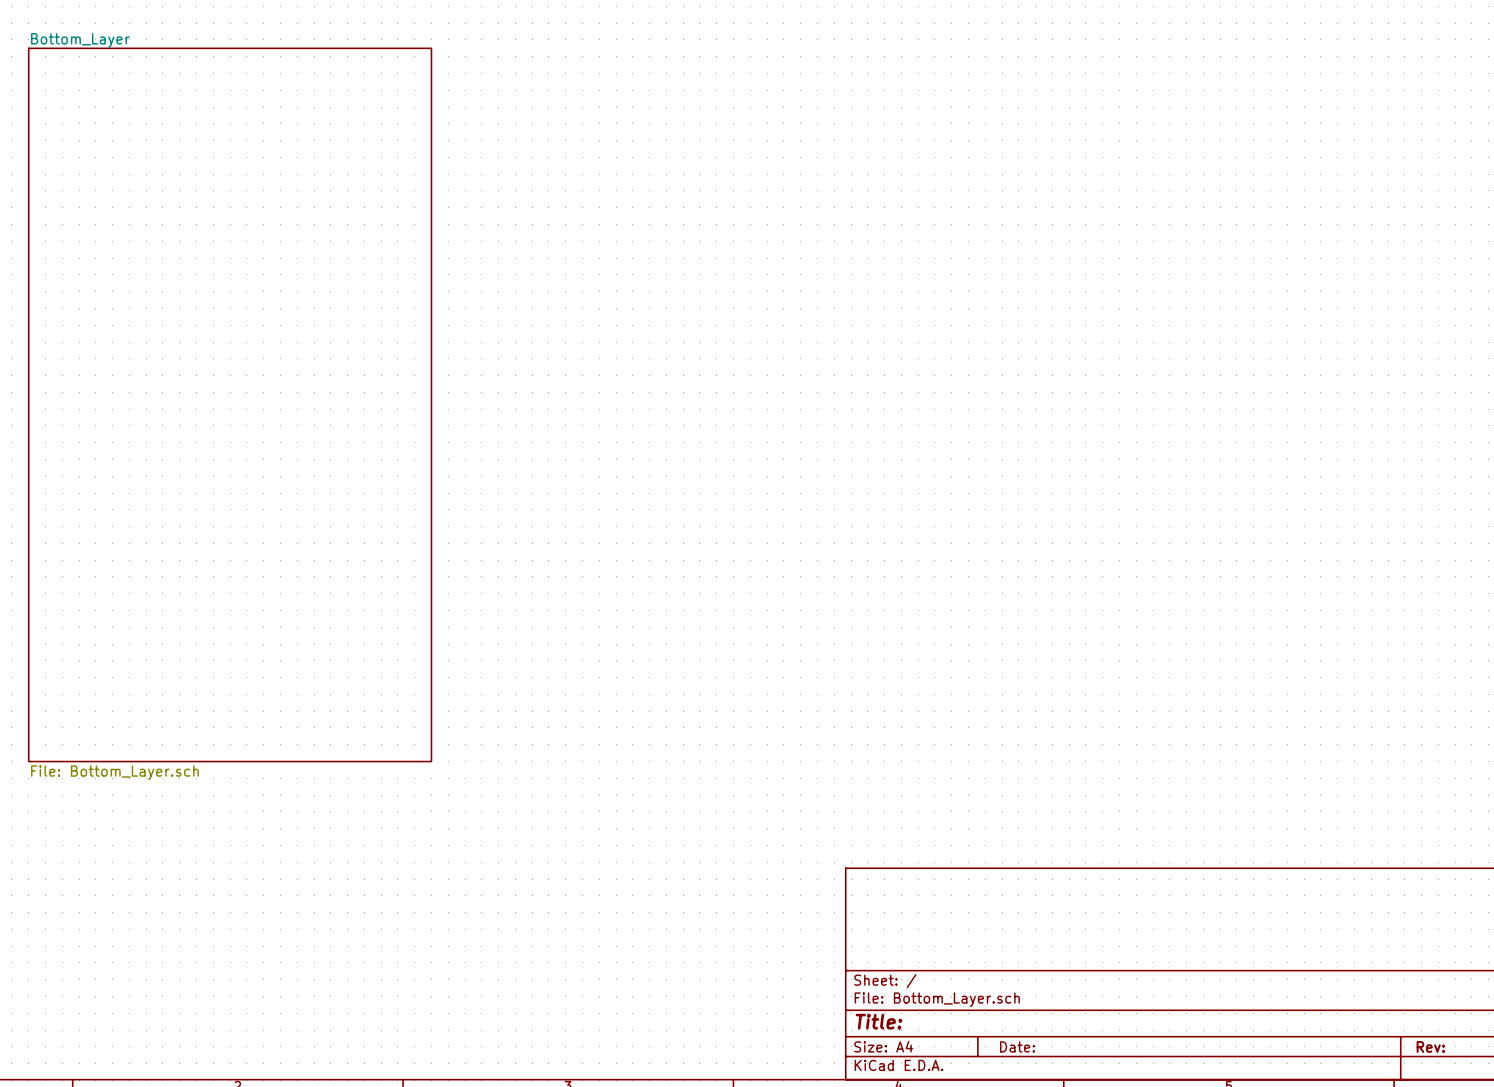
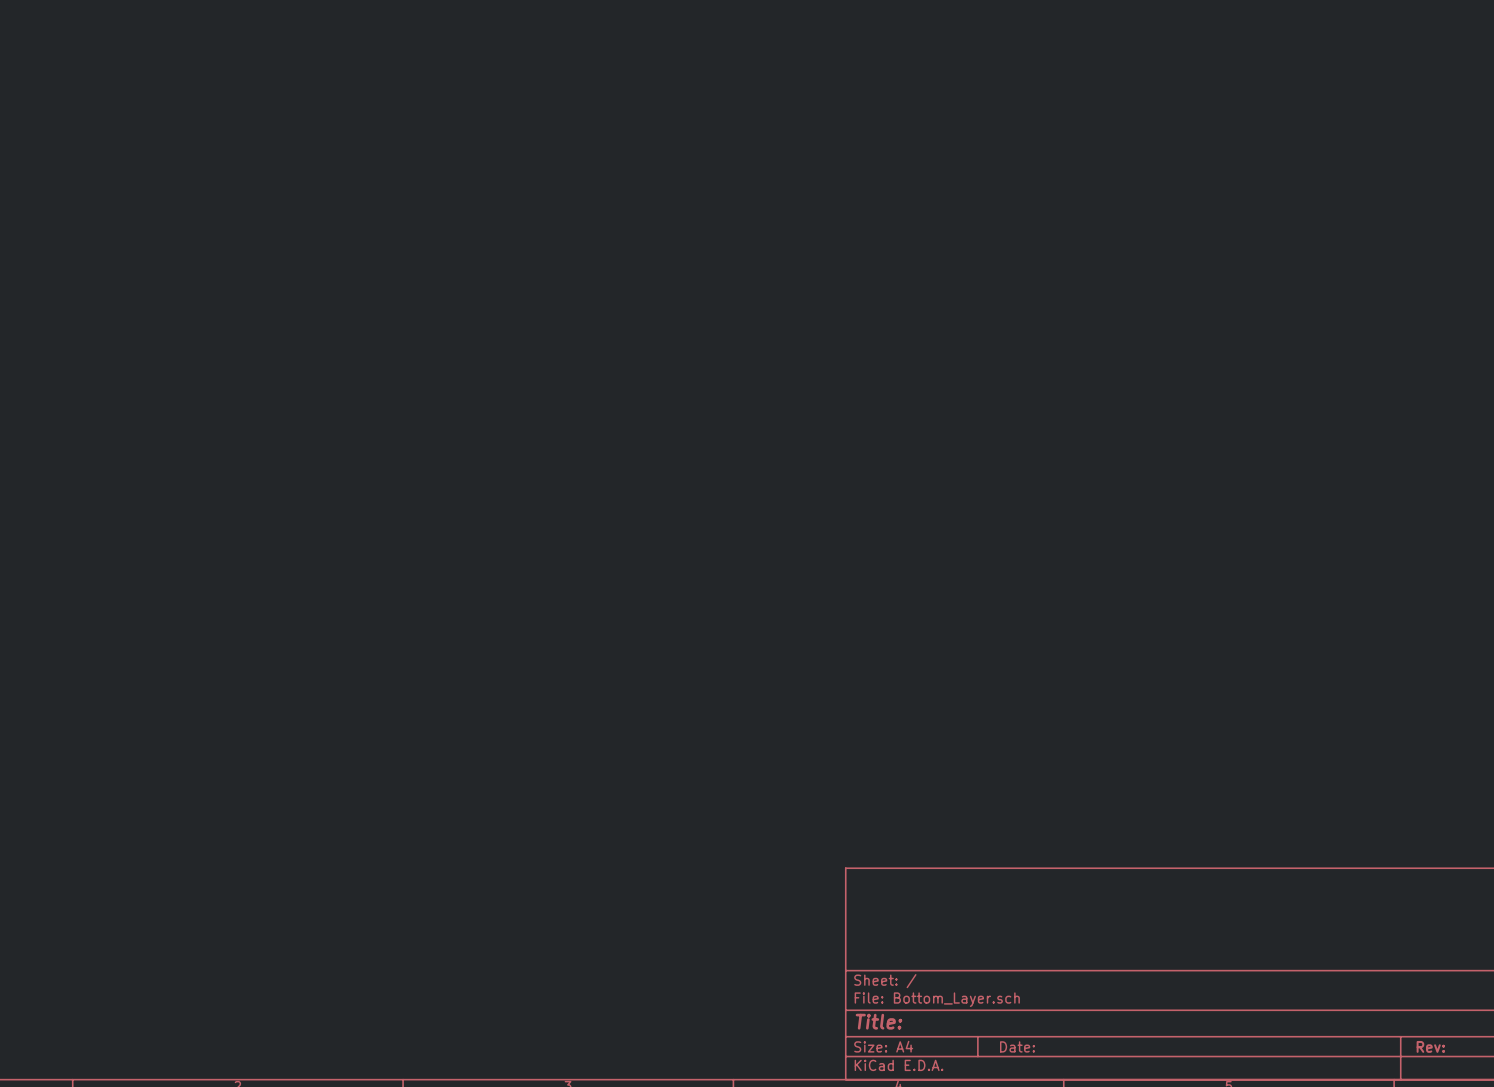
sheet Bottom_Layer: File: Bottom_Layer.sch (230, 404) -> none

